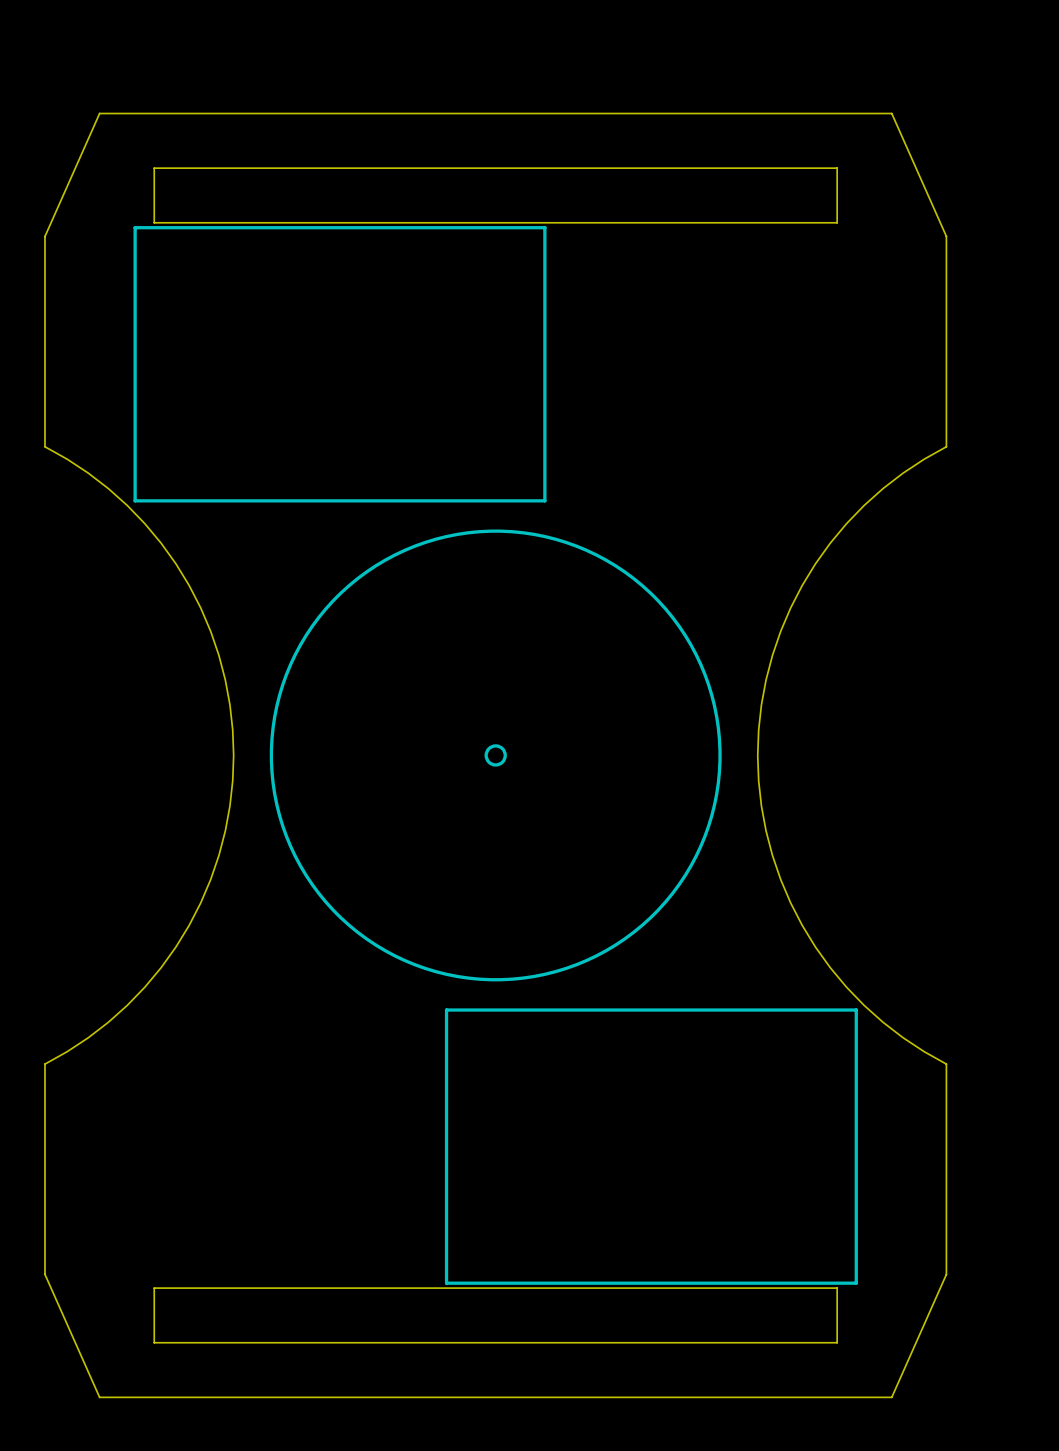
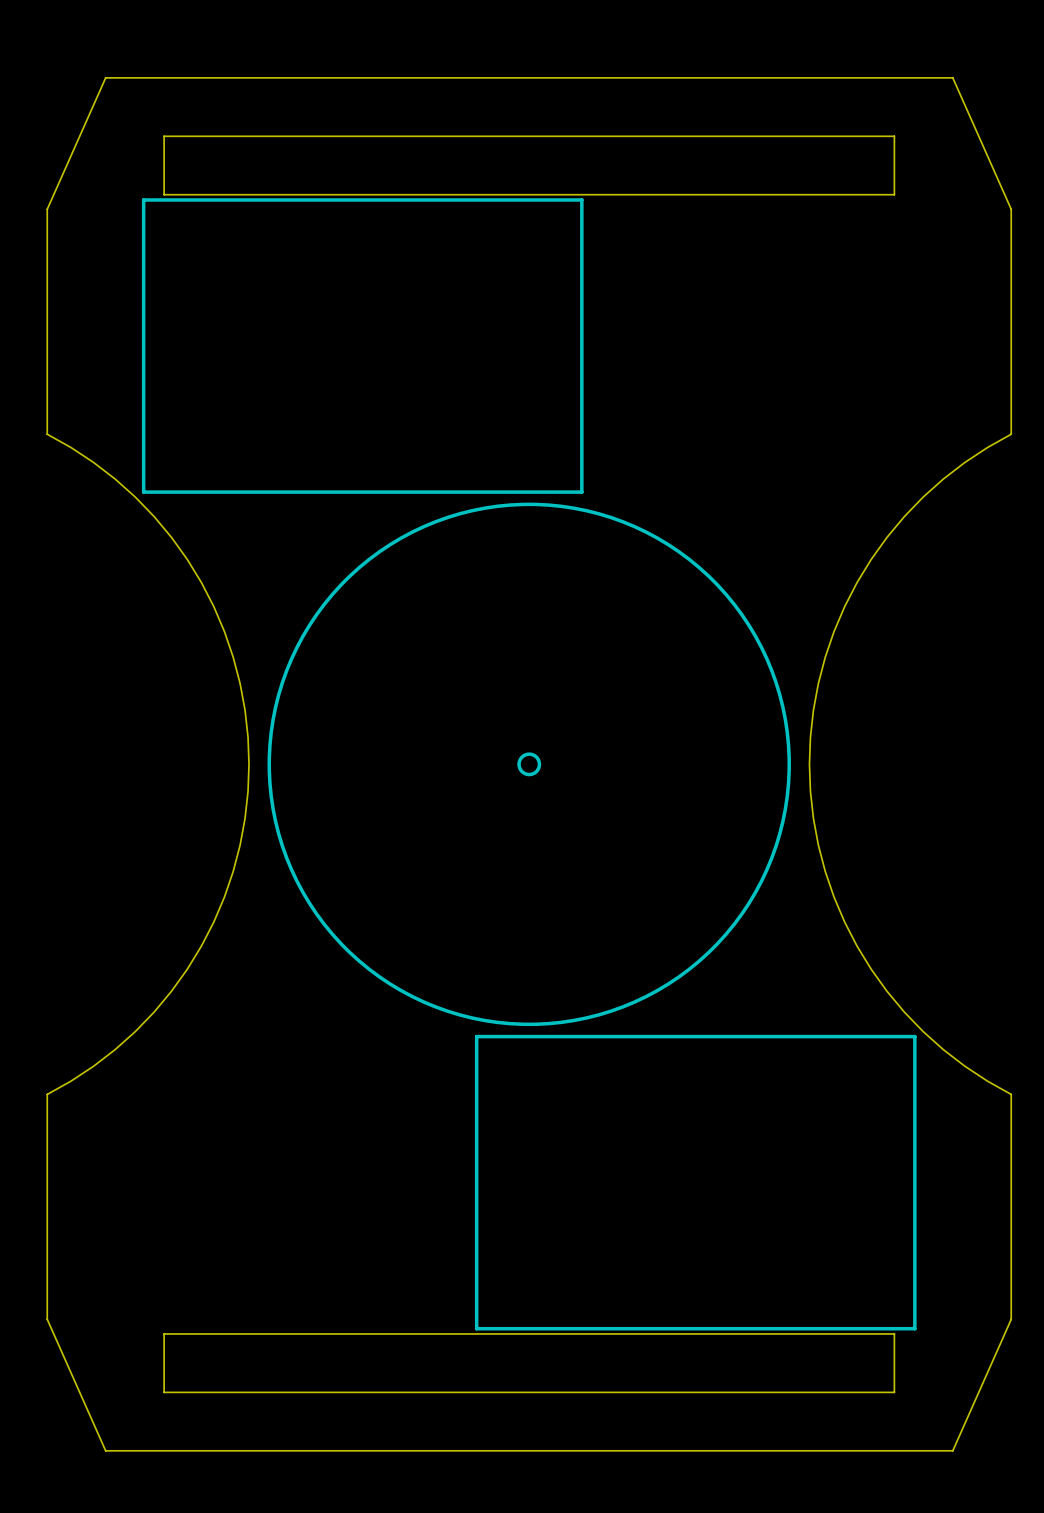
drawing shape: [269, 529, 722, 982] -> [267, 502, 791, 1027]

